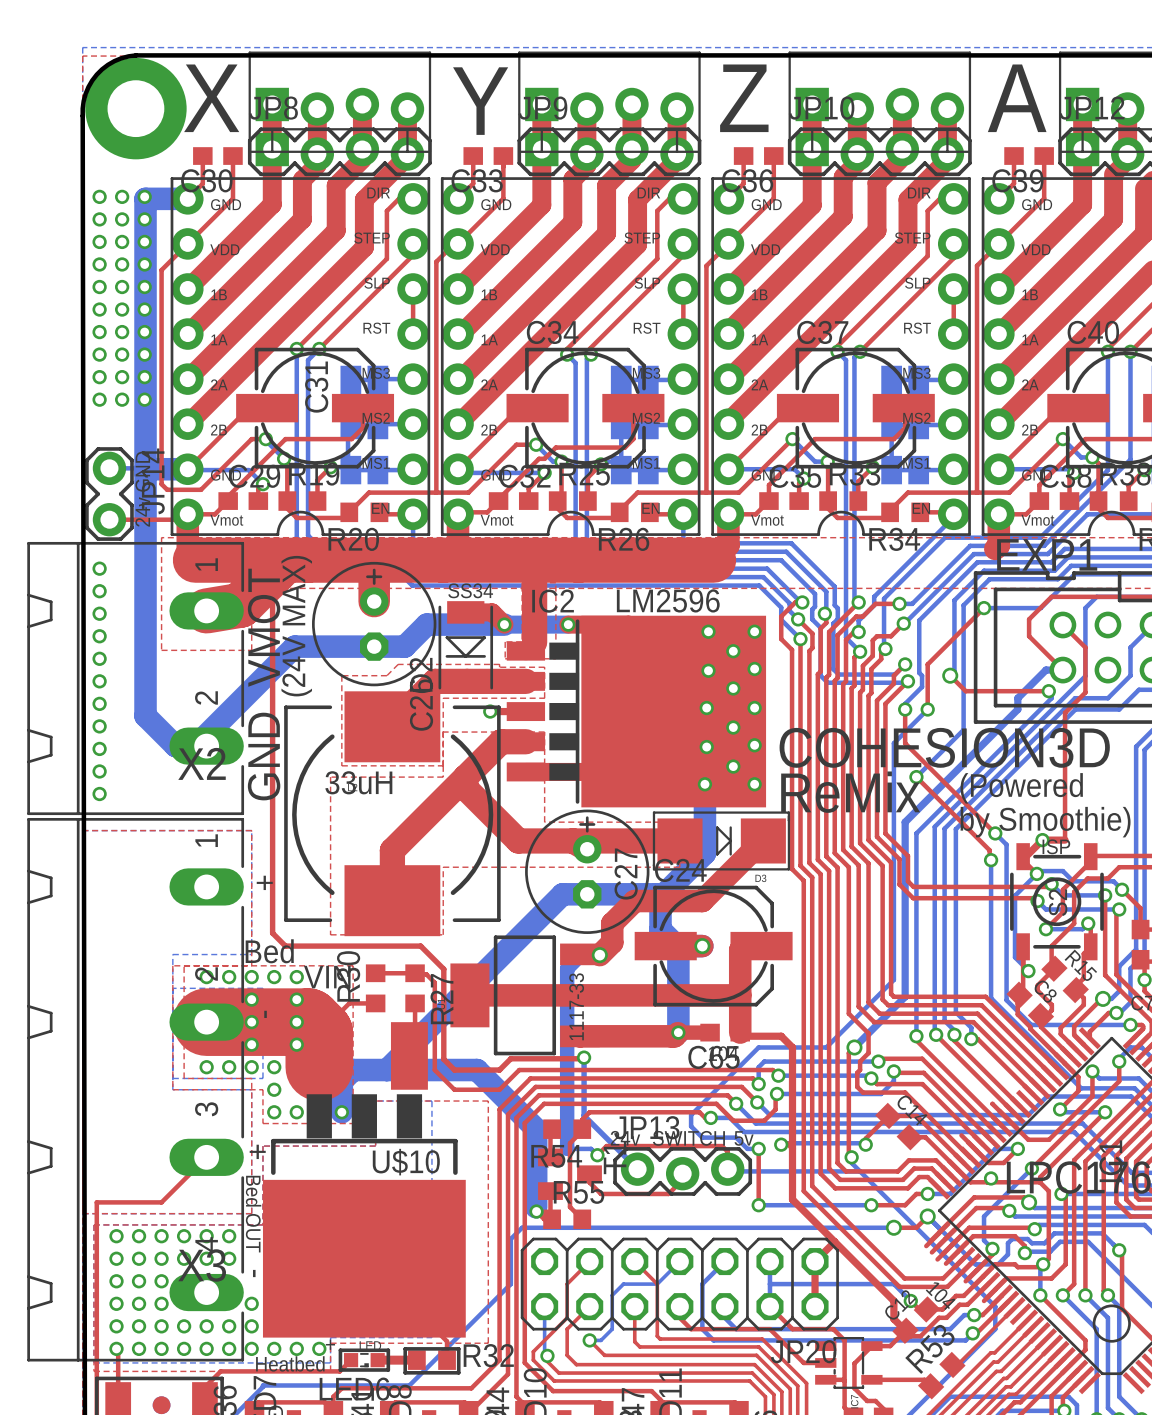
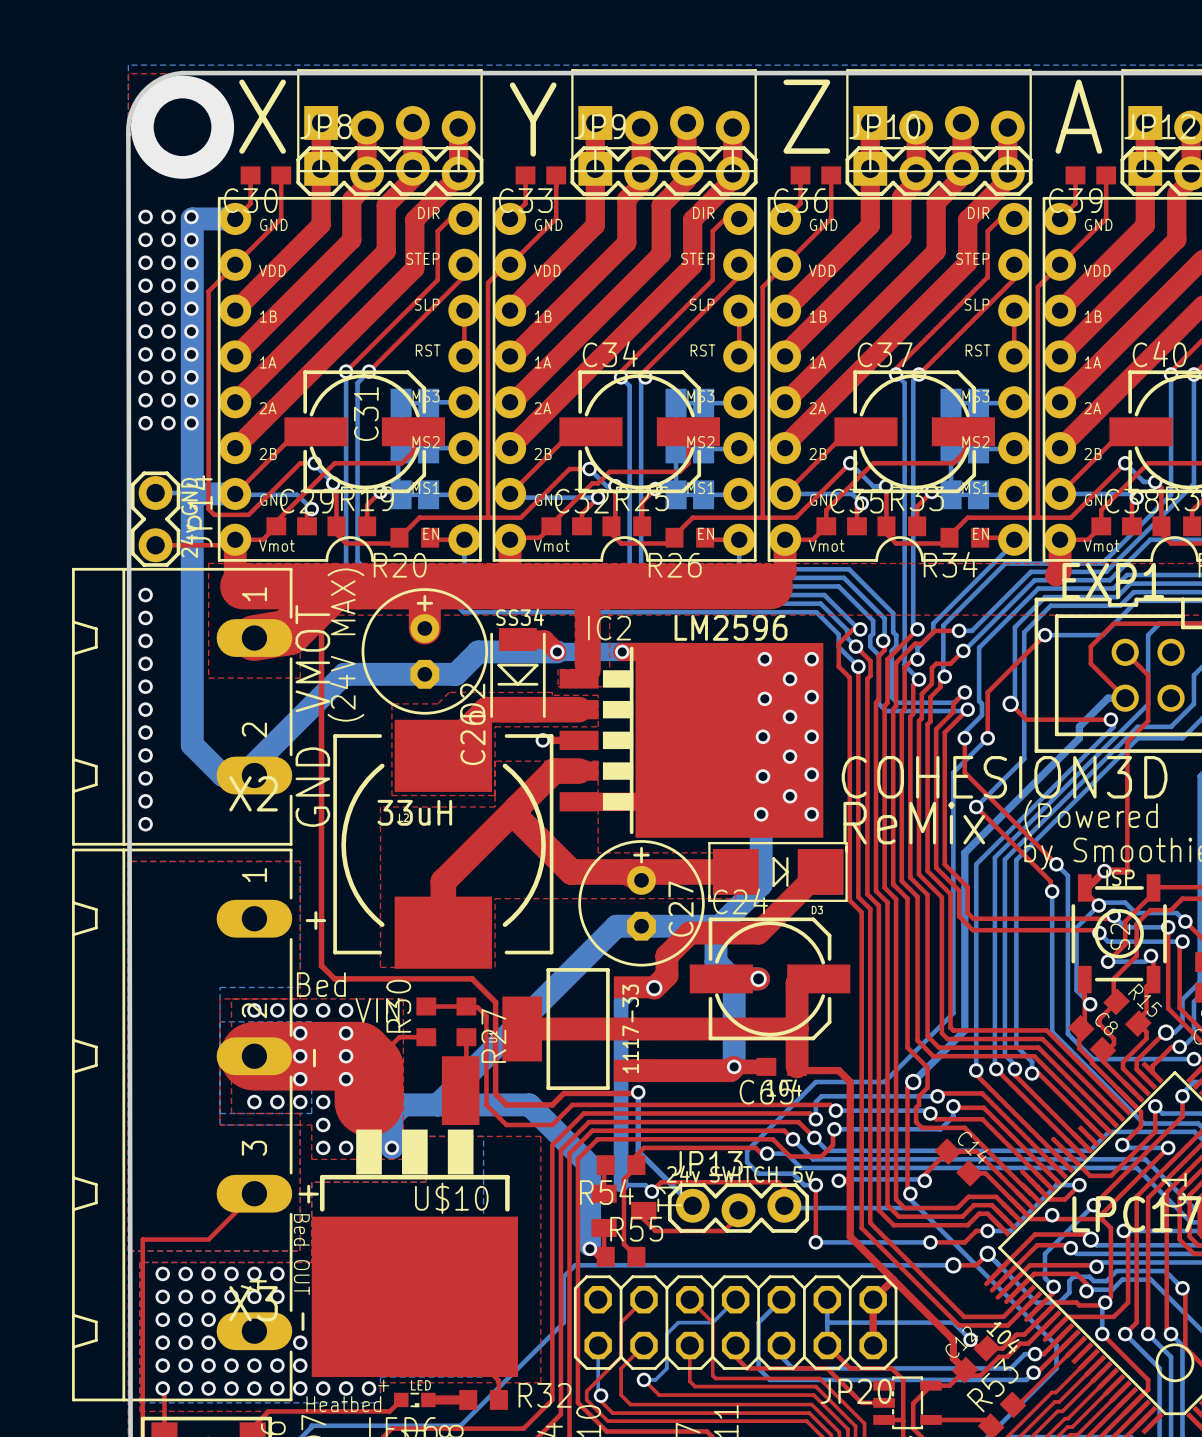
line: (405, 1348) (405, 1372) (458, 1372) (458, 1348) (405, 1348) -> none
line: (340, 1350) (340, 1370) (388, 1370) (388, 1350) (340, 1350) -> none

